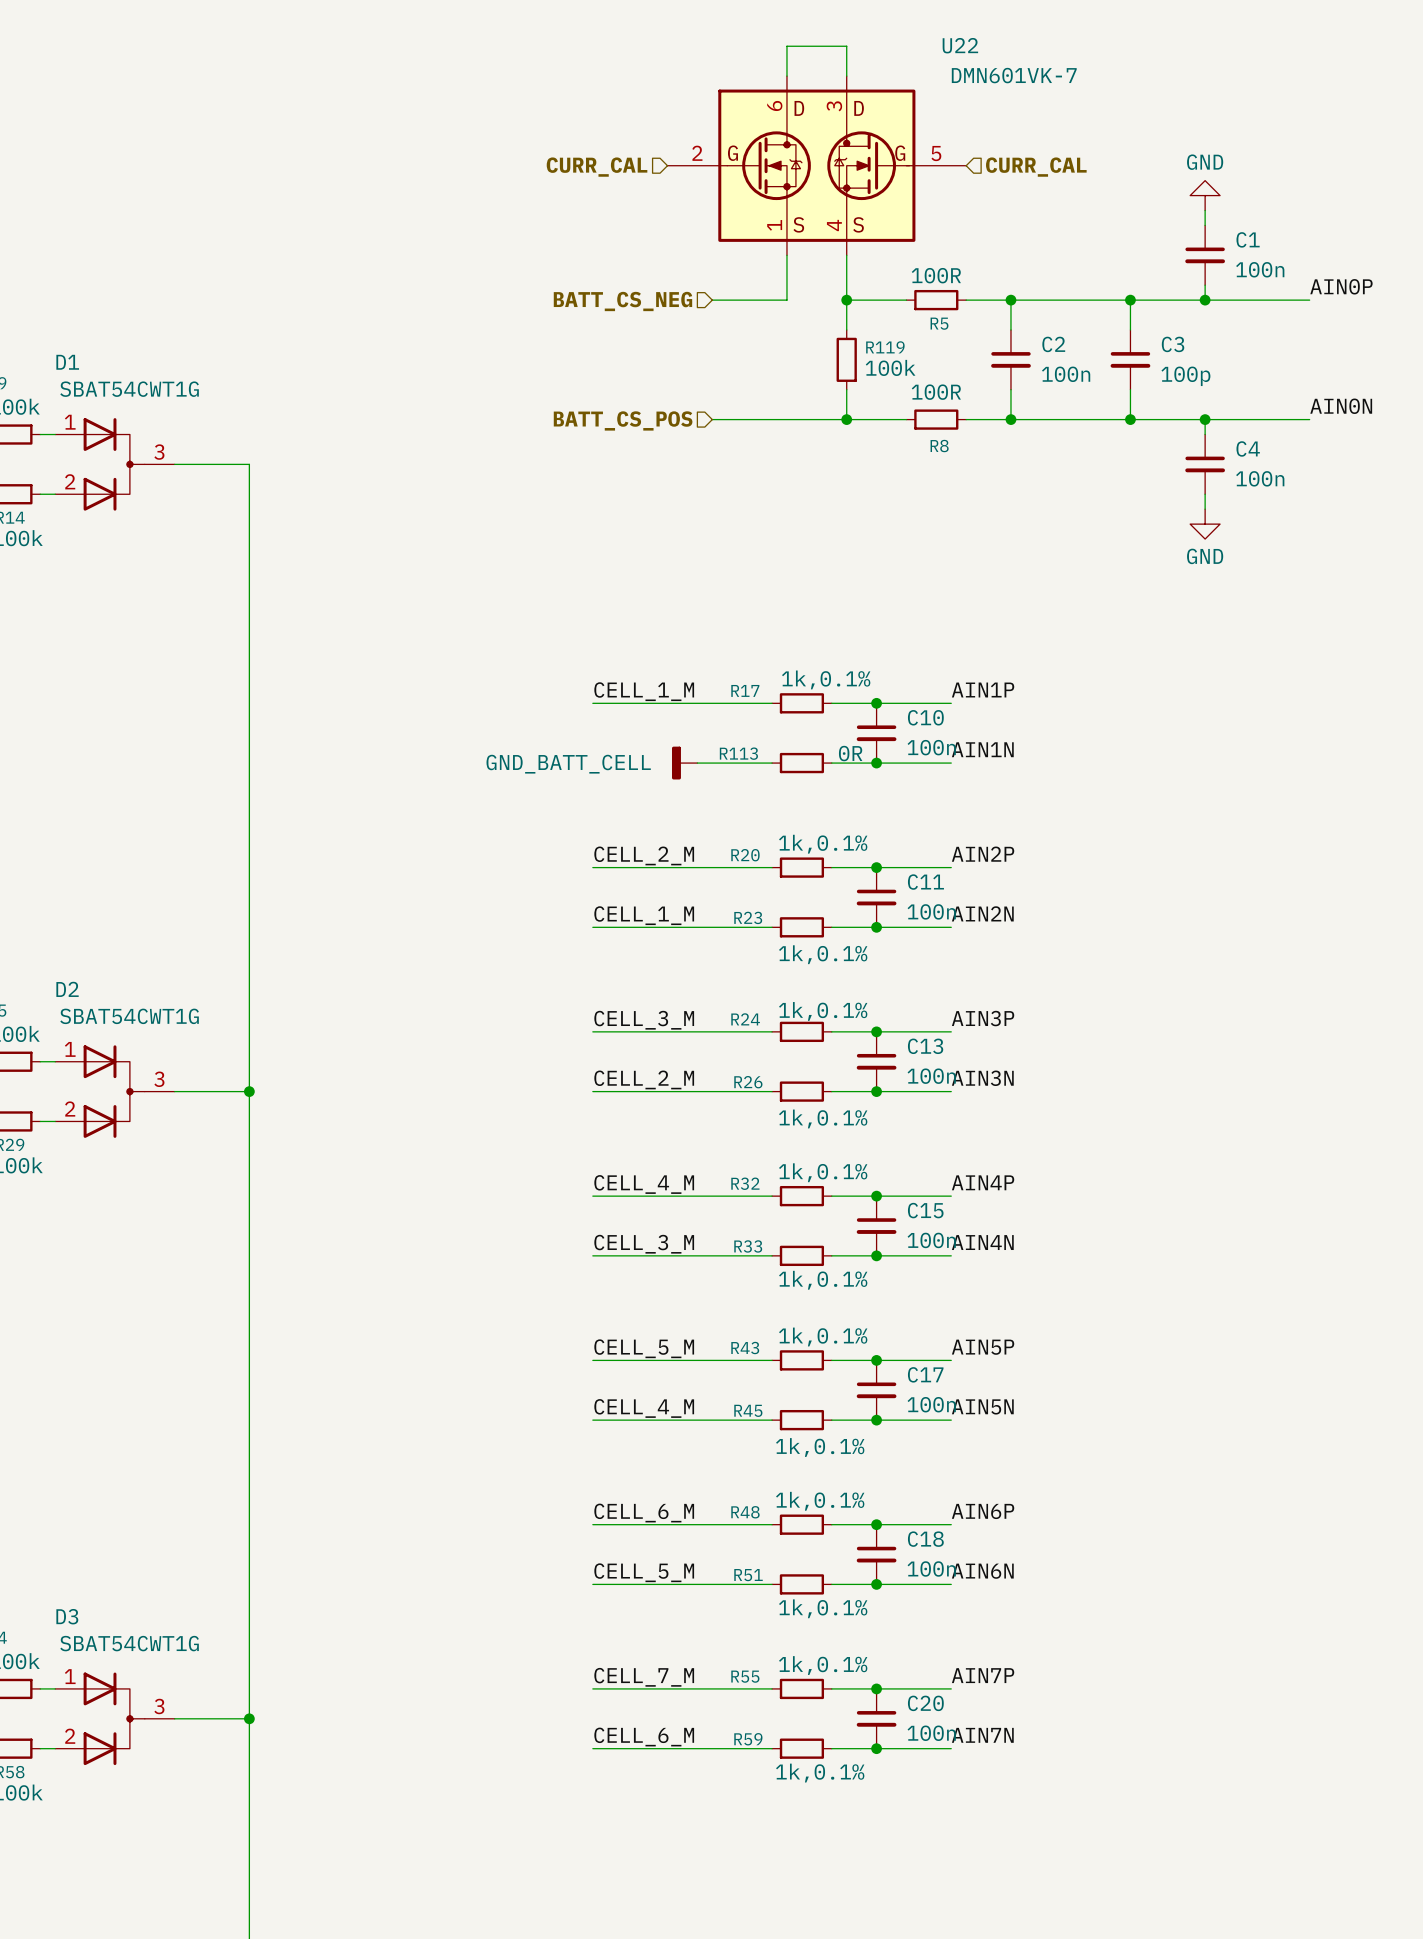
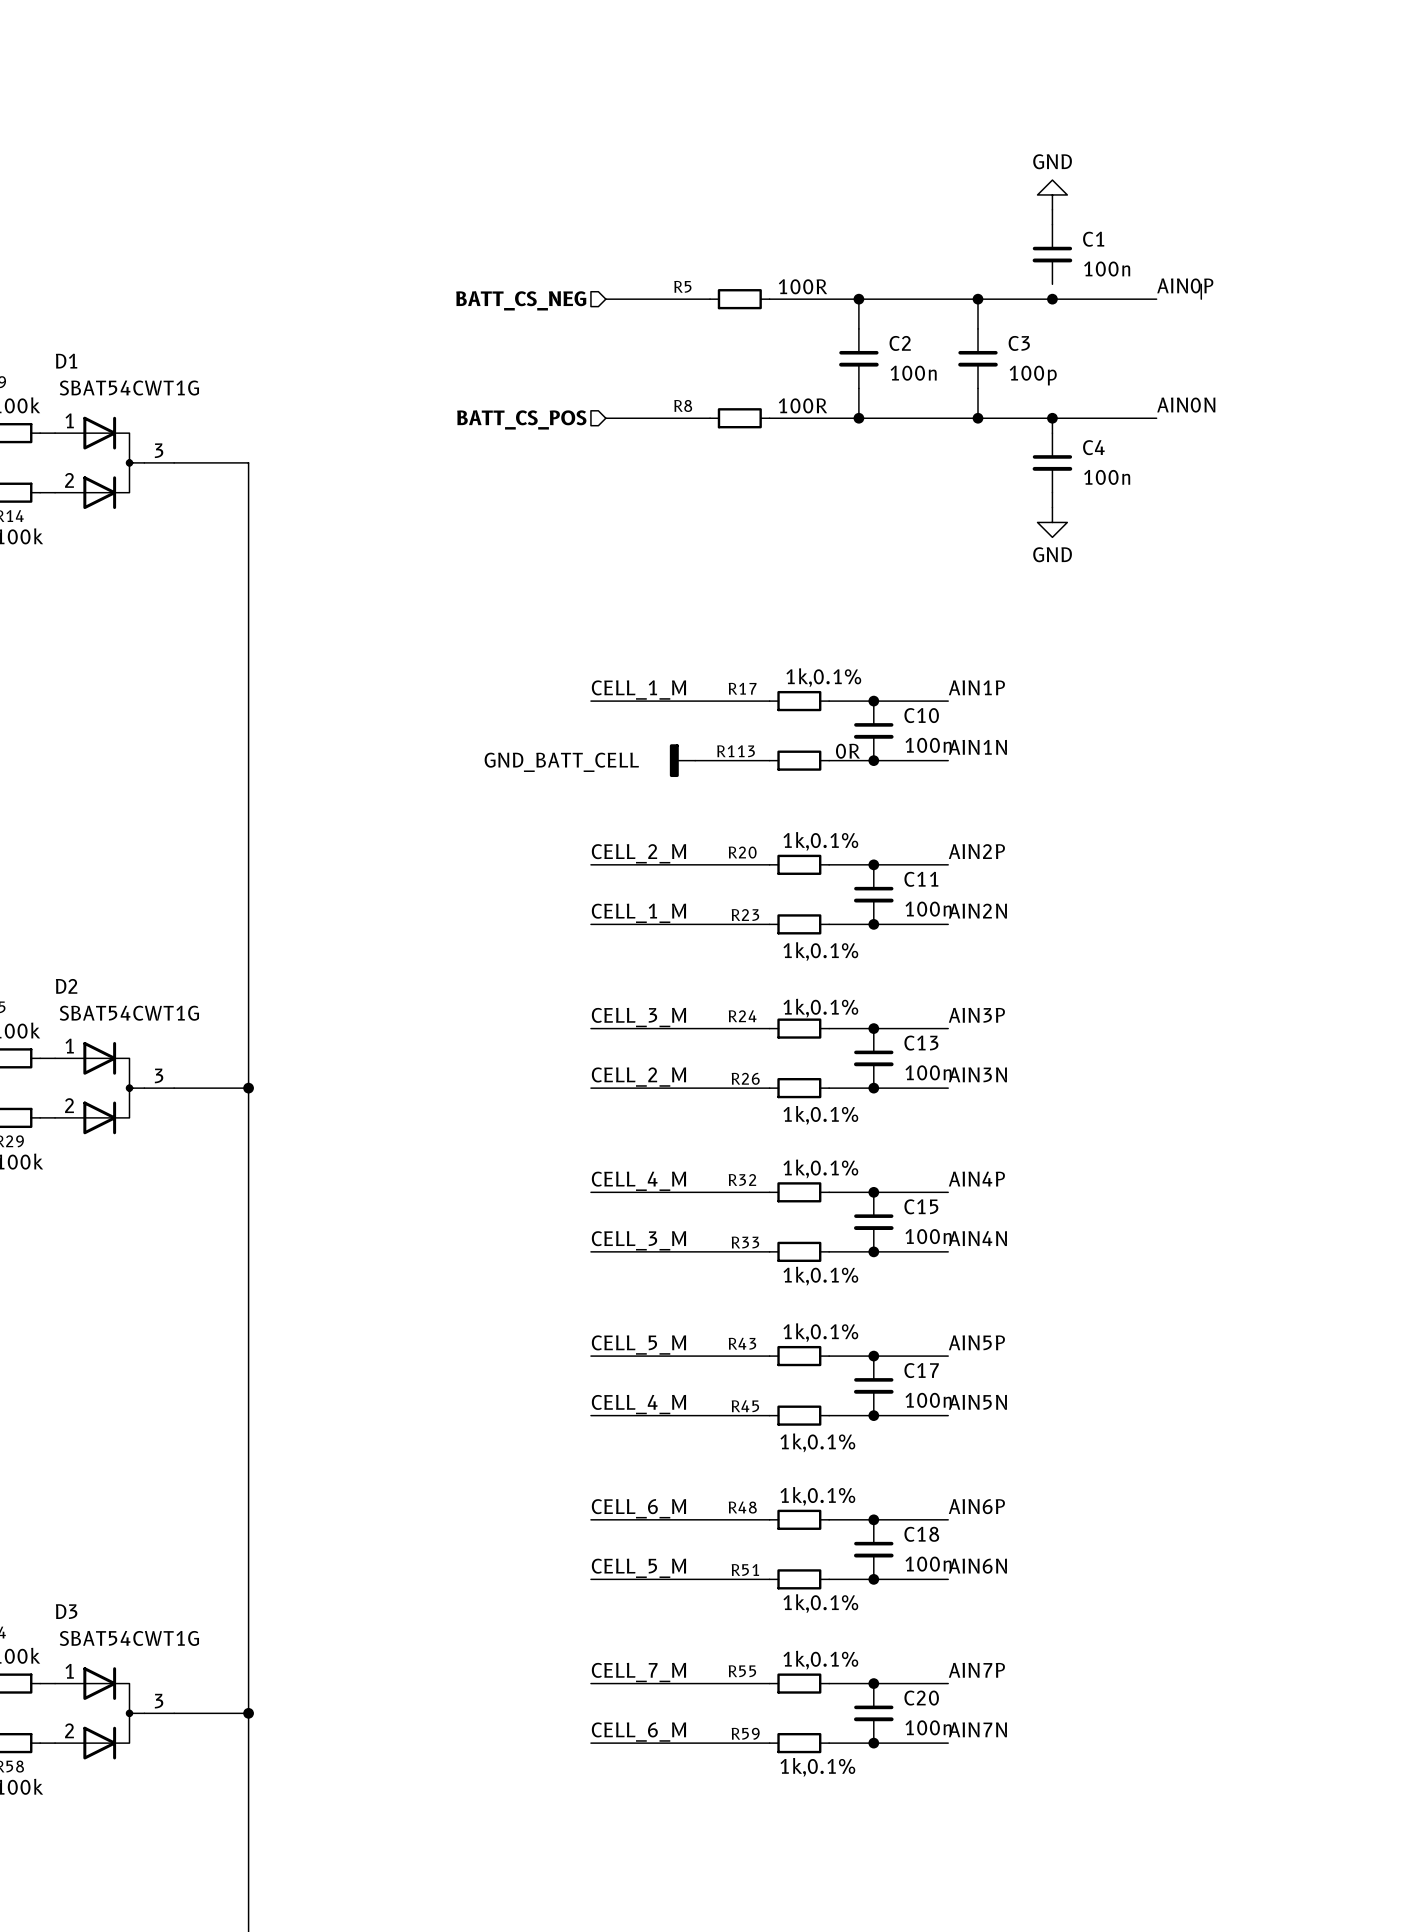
wire: (786, 76) (786, 46) (846, 46) (846, 76) -> none
U22: DMN601VK-7 (816, 165) -> none
hierarchical label: CURR_CAL (597, 167) -> none
hierarchical label: CURR_CAL (1036, 167) -> none
power symbol position: GND (1205, 195) -> GND (1052, 194)
wire: (1205, 210) (1205, 225) -> (1052, 209) (1052, 224)
wire: (786, 255) (786, 300) -> (844, 299) (784, 299)
wire: (846, 255) (846, 329) -> none
C1 position: (1205, 255) -> (1052, 254)
R5 value position: 100R (936, 275) -> 100R (802, 286)
label position: AIN0P (1341, 286) -> AIN0P (1185, 285)
wire: (712, 300) (772, 300) -> (710, 299) (605, 299)
junction position: (846, 300) -> (858, 299)
wire: none -> (903, 299) (963, 299)
R5 position: (936, 300) -> (739, 299)
junction: none -> (978, 299)
wire: (1010, 300) (1010, 329) -> (858, 299) (858, 328)
junction: (1010, 300) -> none
junction: none -> (1052, 299)
wire: (1130, 300) (1130, 329) -> (978, 299) (978, 328)
junction: (1130, 300) -> none
wire: (1160, 300) (1309, 300) -> none
junction: (1205, 300) -> none
hierarchical label position: BATT_CS_NEG (622, 301) -> BATT_CS_NEG (521, 300)
R5 name position: R5 (939, 323) -> R5 (682, 286)
R119: 100k (846, 359) -> none
C2 position: (1010, 359) -> (858, 358)
C3 position: (1130, 359) -> (978, 358)
wire: (846, 389) (846, 419) -> none
wire: (1010, 389) (1010, 419) -> (858, 388) (858, 418)
wire: (1130, 389) (1130, 419) -> (978, 388) (978, 418)
R8 value position: 100R (936, 392) -> 100R (802, 405)
label position: AIN0N (1341, 406) -> AIN0N (1186, 405)
wire: (712, 419) (772, 419) -> (710, 418) (605, 418)
junction position: (846, 419) -> (858, 418)
wire: none -> (903, 418) (963, 418)
R8 position: (936, 419) -> (739, 418)
junction: none -> (978, 418)
junction: (1010, 419) -> none
junction: none -> (1052, 418)
junction: (1130, 419) -> none
wire: (1160, 419) (1309, 419) -> none
wire: (1205, 419) (1205, 434) -> (1052, 418) (1052, 433)
junction: (1205, 419) -> none
hierarchical label position: BATT_CS_POS (623, 420) -> BATT_CS_POS (521, 419)
R8 name position: R8 (939, 446) -> R8 (683, 405)
C4 position: (1205, 464) -> (1052, 462)
wire: (1205, 494) (1205, 509) -> (1052, 492) (1052, 507)
power symbol position: GND (1205, 524) -> GND (1052, 522)

